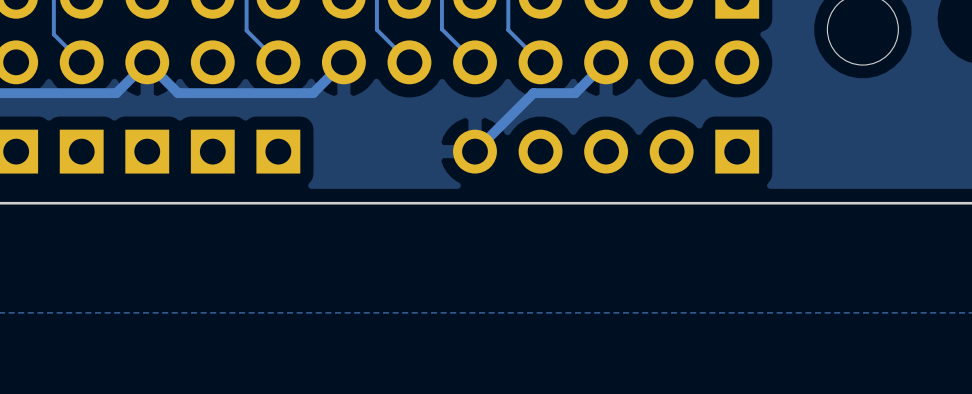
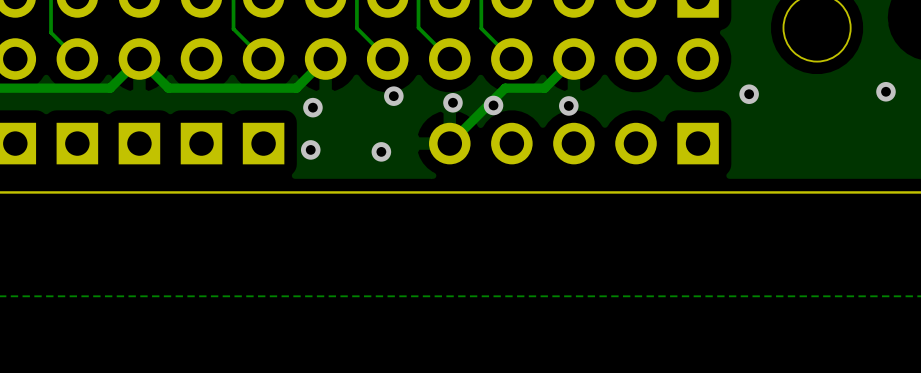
via: none -> (885, 91)
via: none -> (749, 94)
via: none -> (393, 96)
via: none -> (452, 102)
via: none -> (493, 105)
via: none -> (568, 105)
via: none -> (312, 107)
via: none -> (310, 149)
via: none -> (381, 151)

